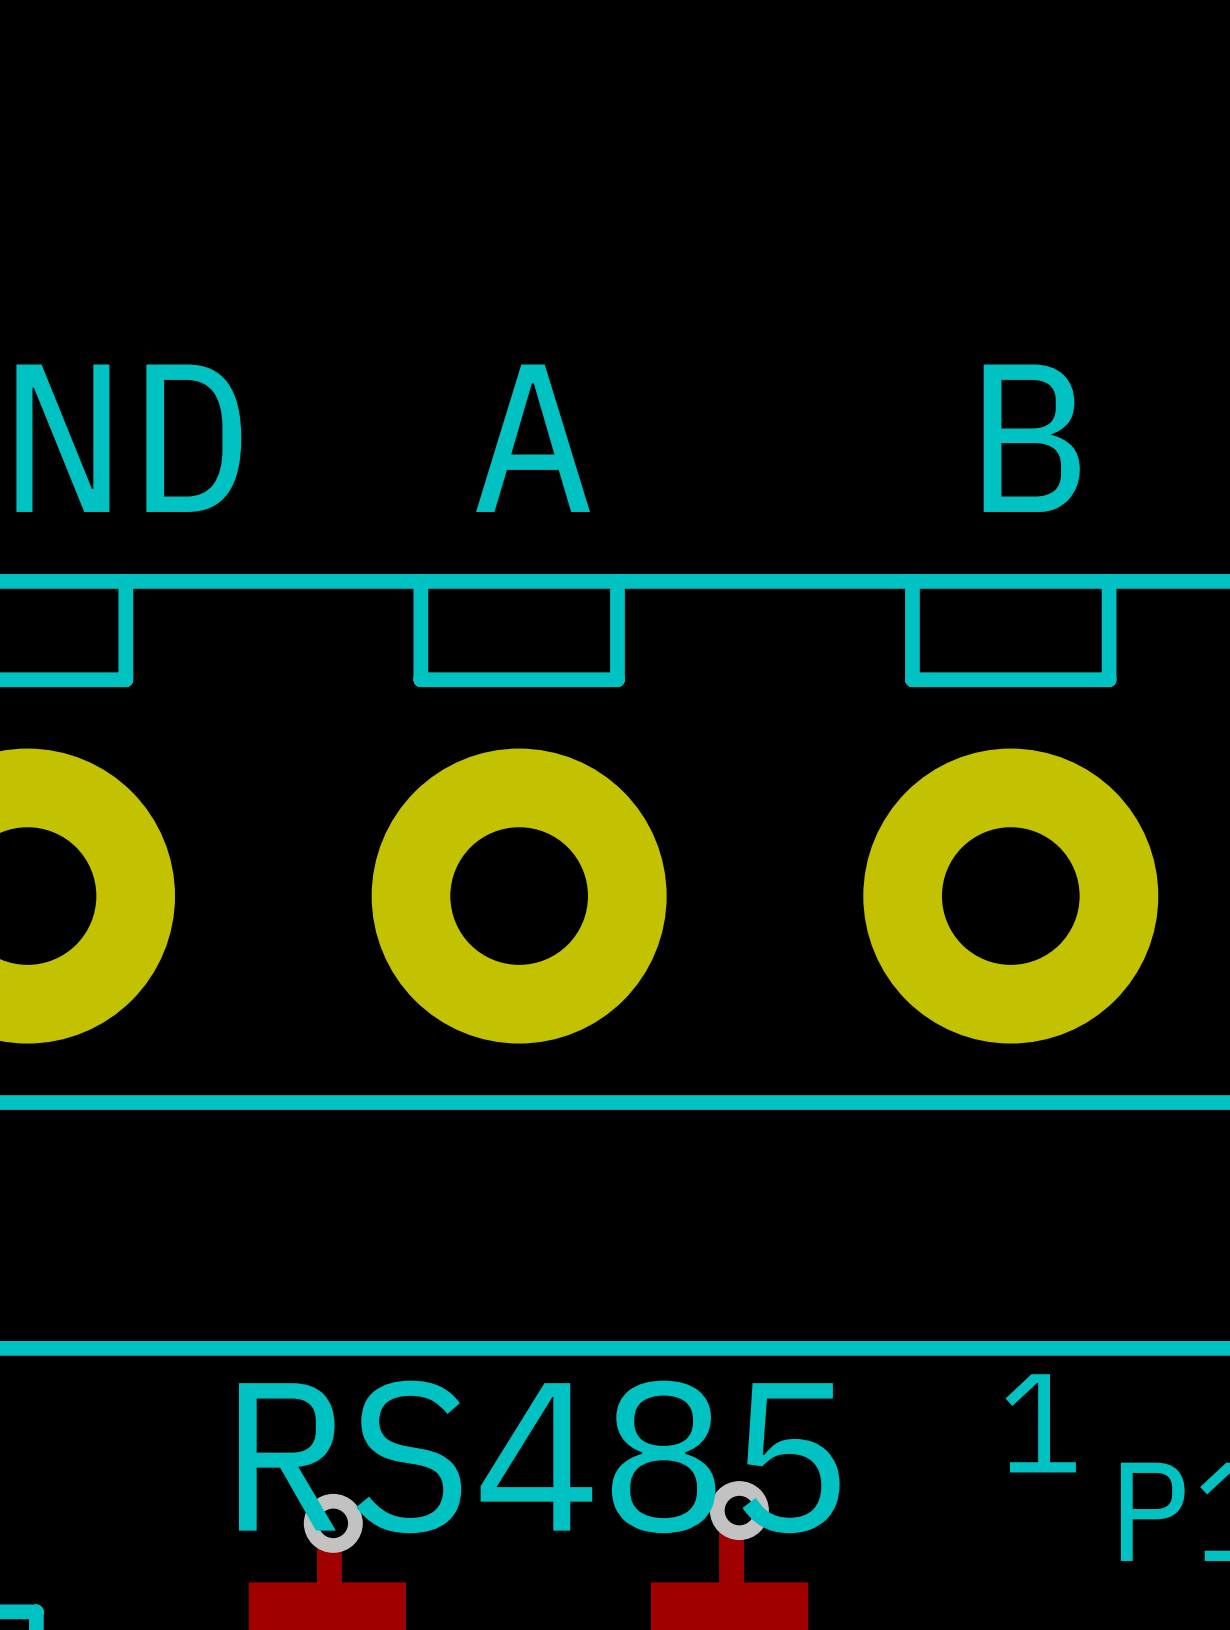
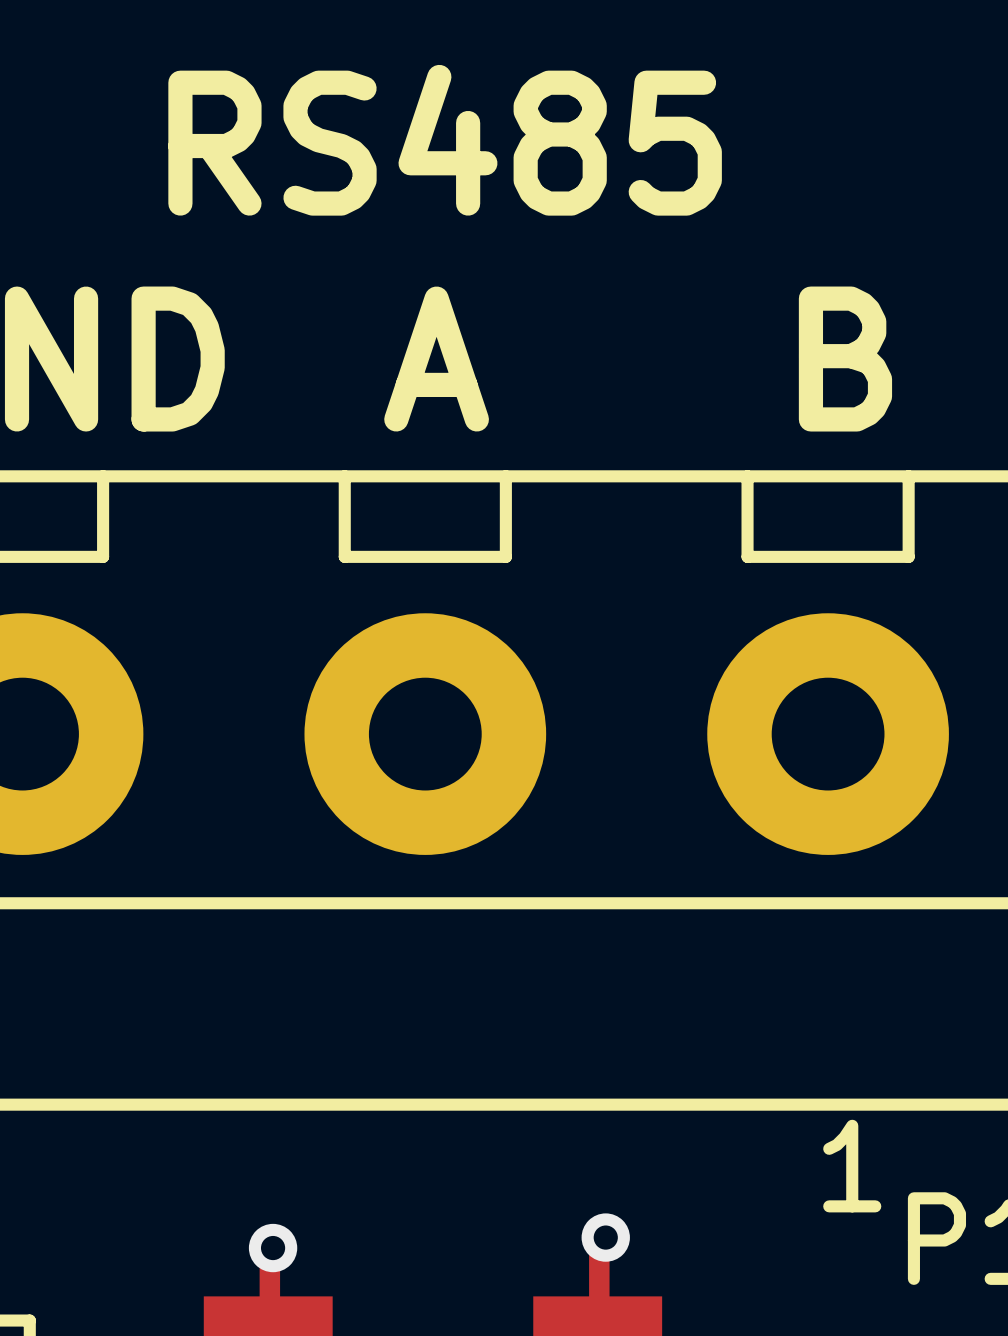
text position: RS485 (539, 1456) -> RS485 (445, 140)

